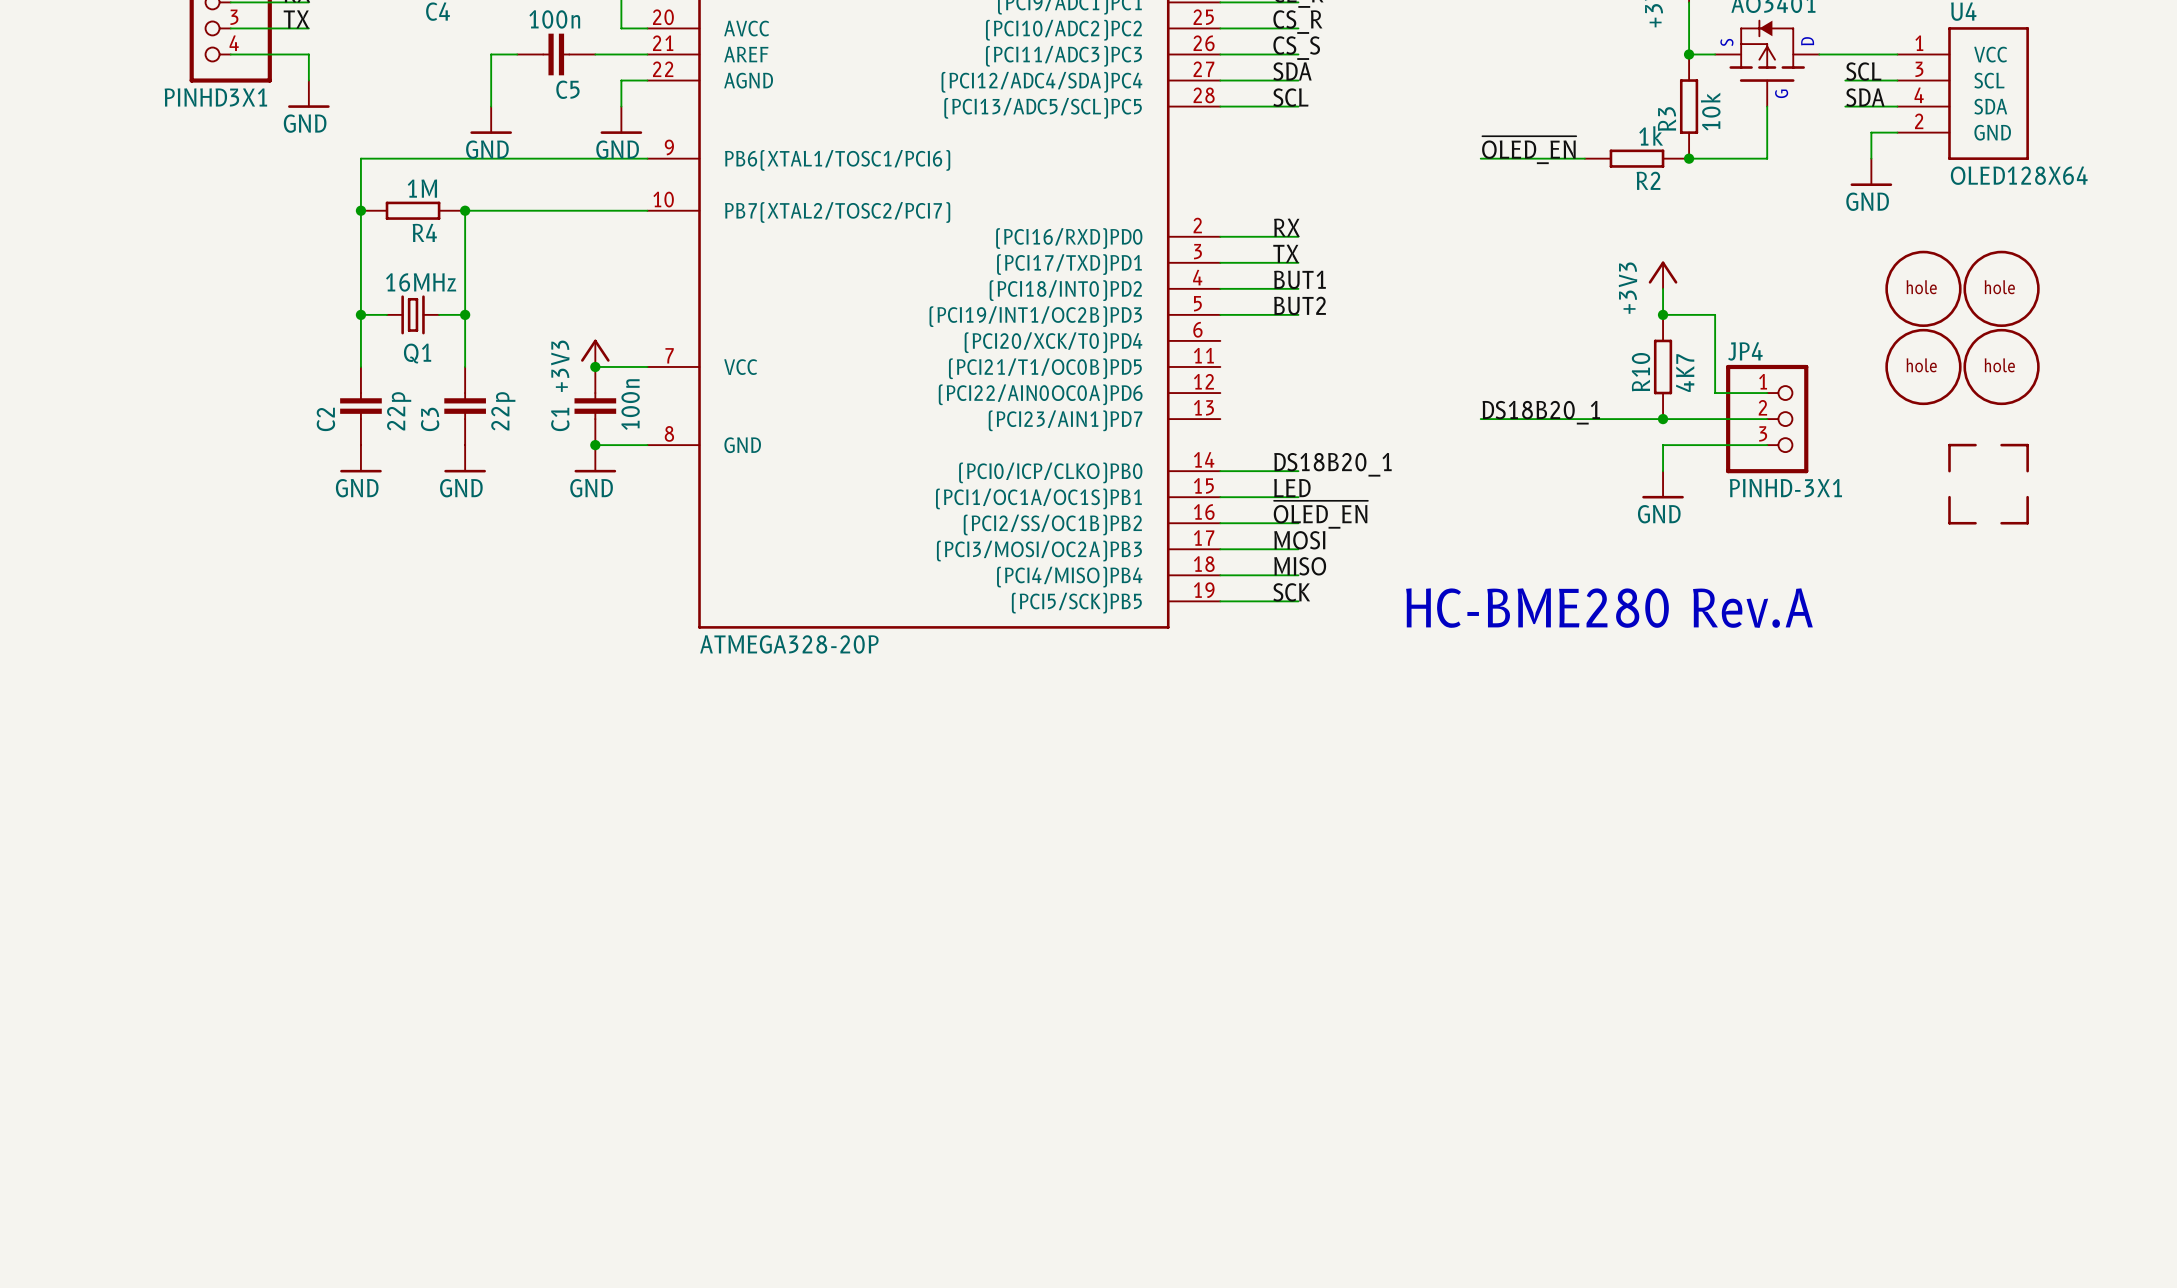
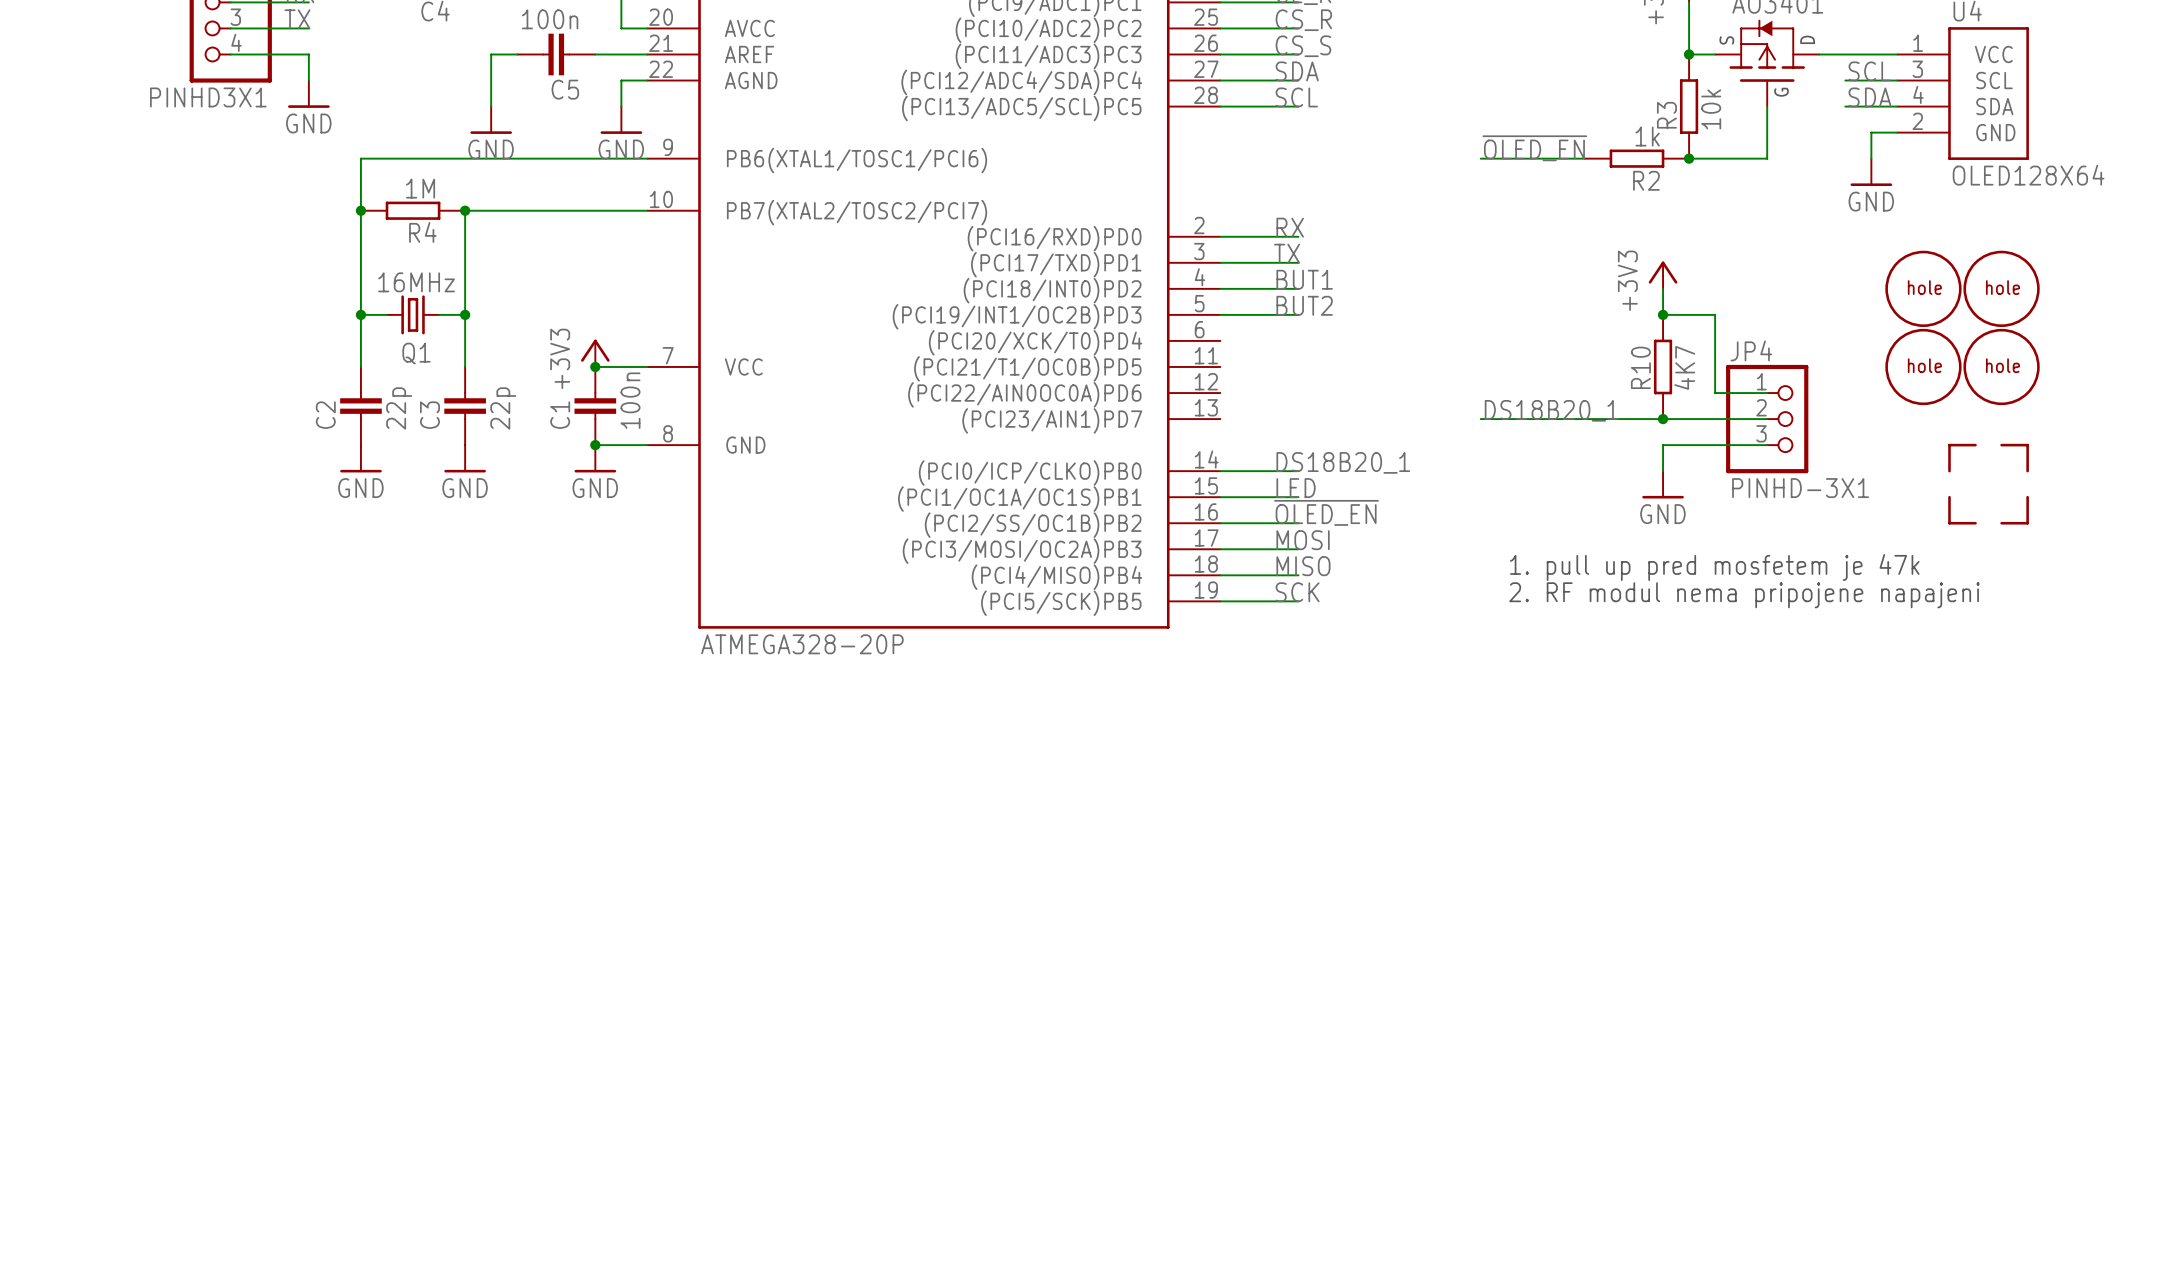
text: none -> 1. pull up pred mosfetem je 47k (1714, 567)
text: none -> 2. RF modul nema pripojene napajeni (1744, 595)
text: HC-BME280 Rev.A (1609, 608) -> none

